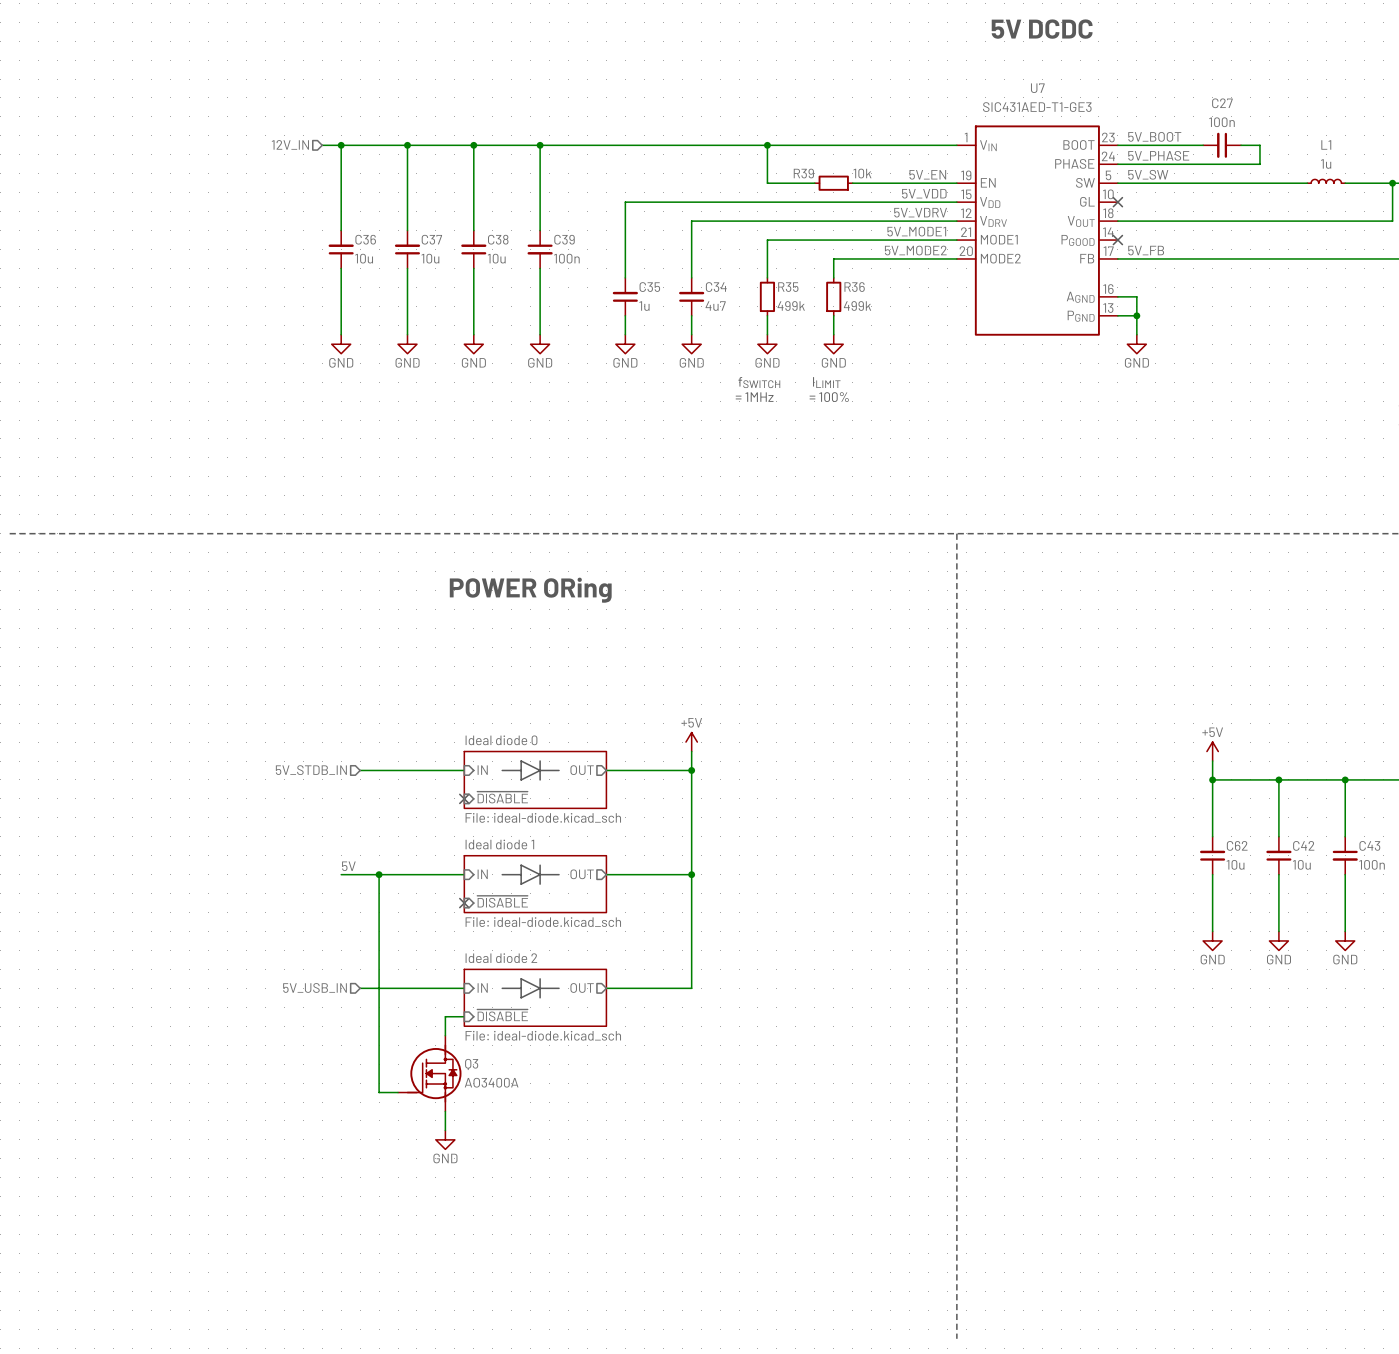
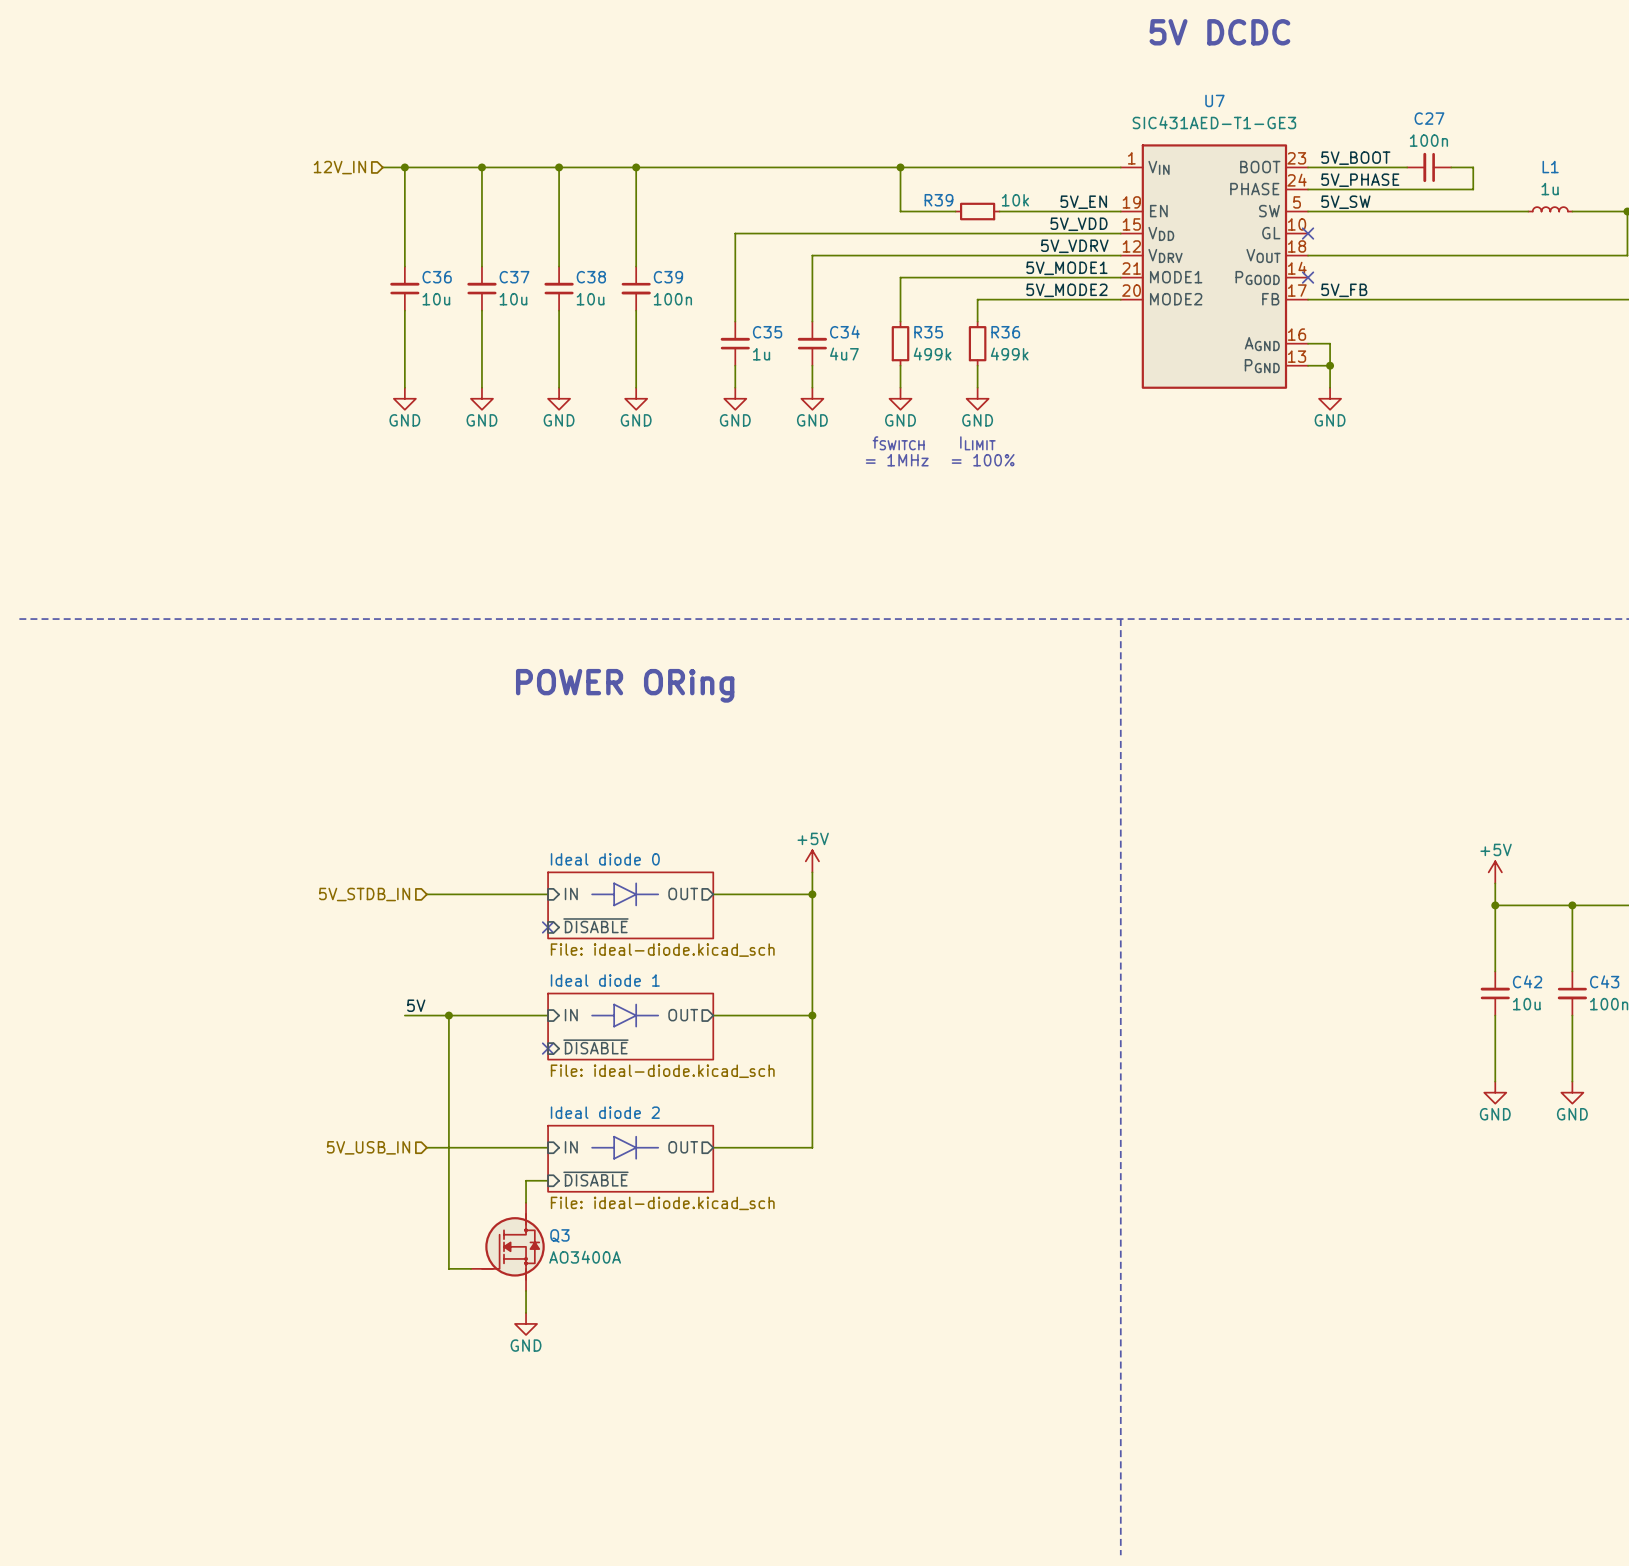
power symbol position: +5V (1212, 751) -> +5V (1495, 872)
wire: (1212, 761) (1212, 836) -> none
wire: (1212, 779) (1278, 779) -> (1495, 883) (1495, 905)
junction: (1212, 779) -> none
C62: (1212, 855) -> none
wire: (1212, 874) (1212, 931) -> none
power symbol: GND (1212, 940) -> none

